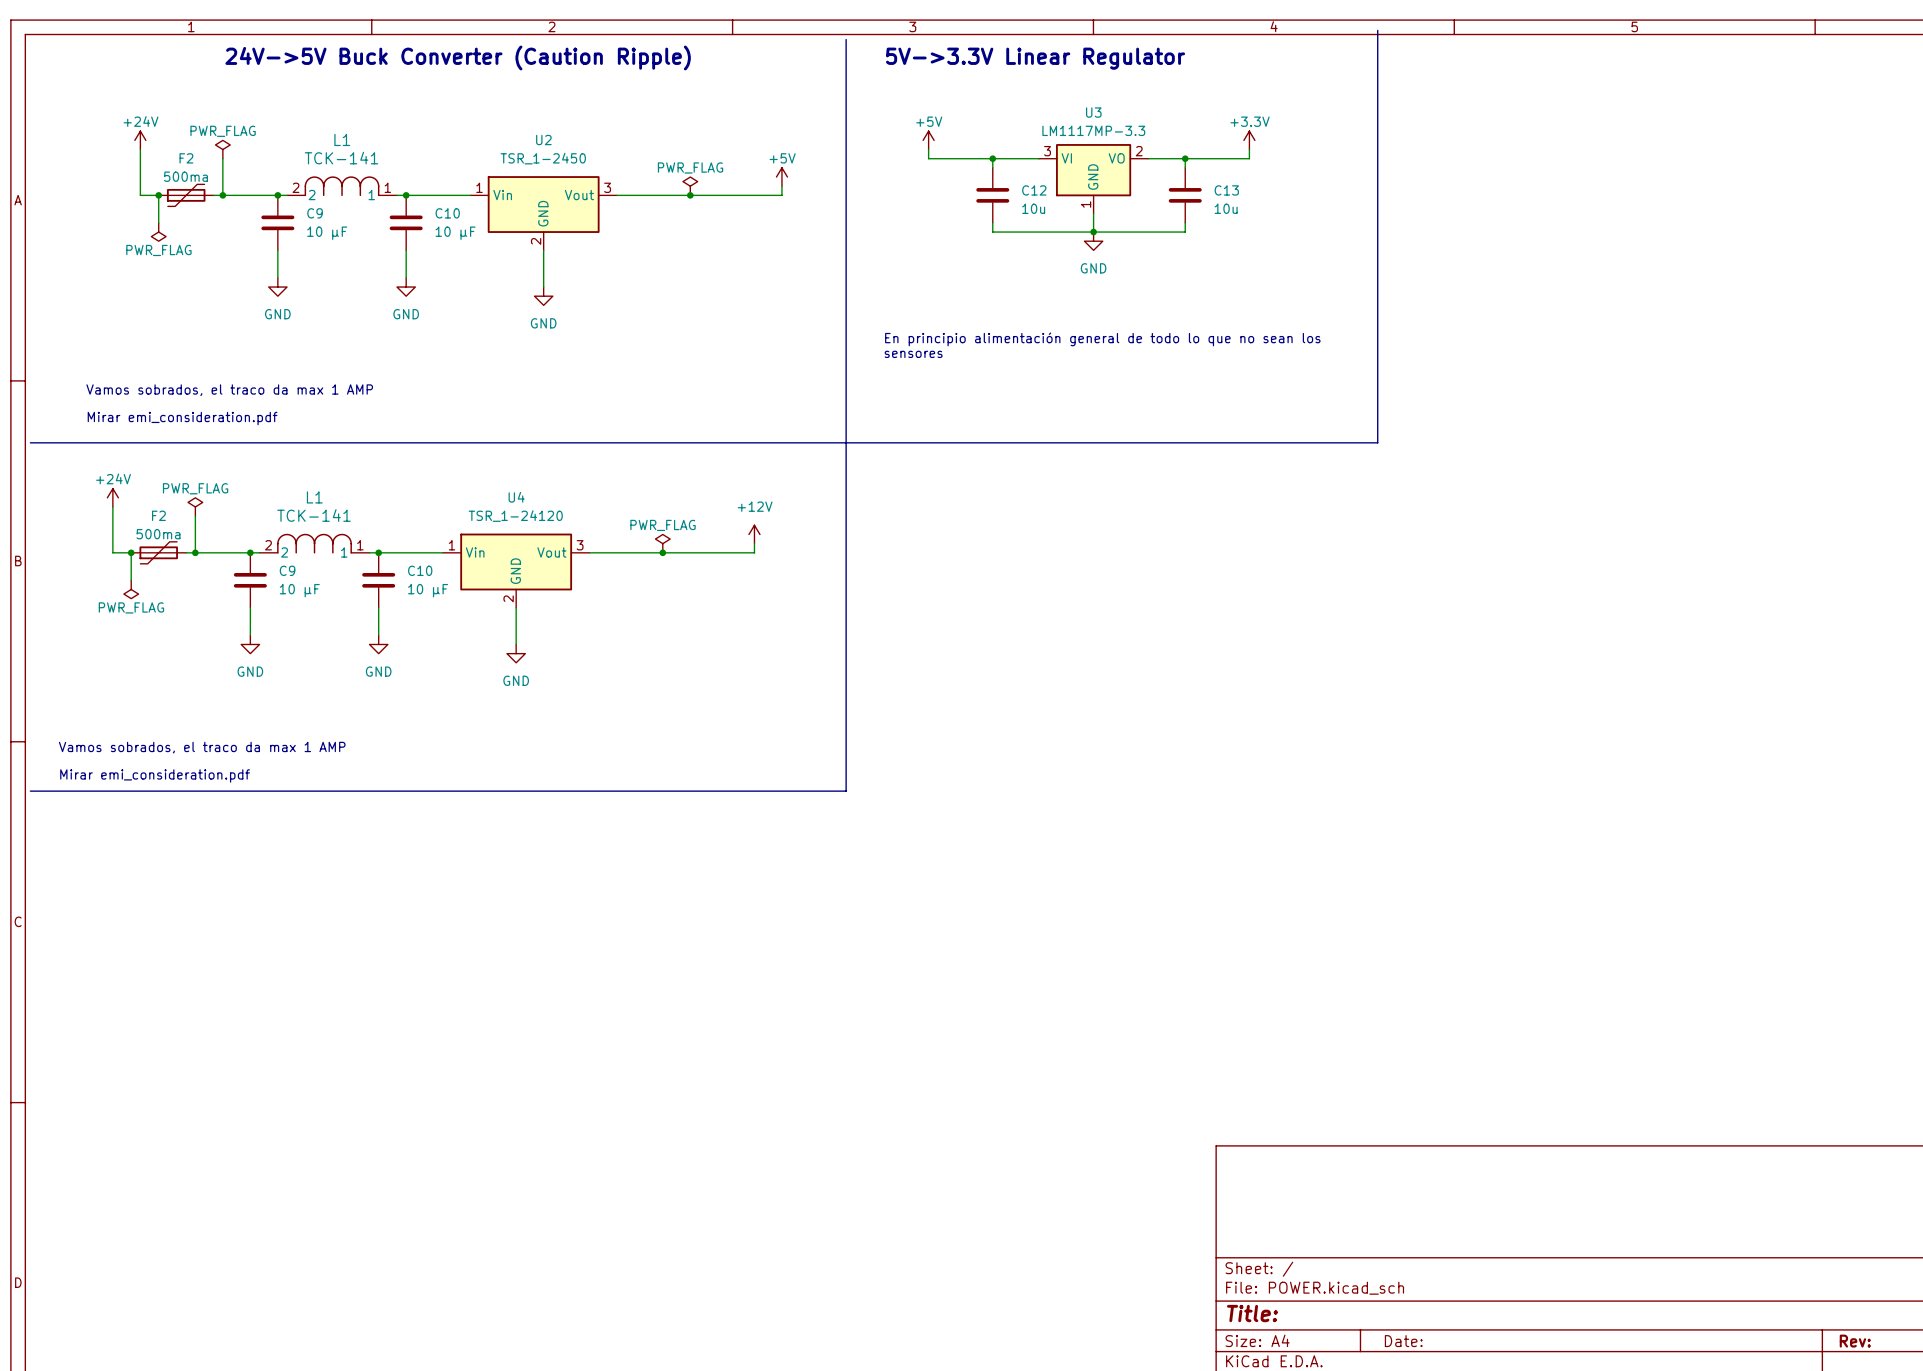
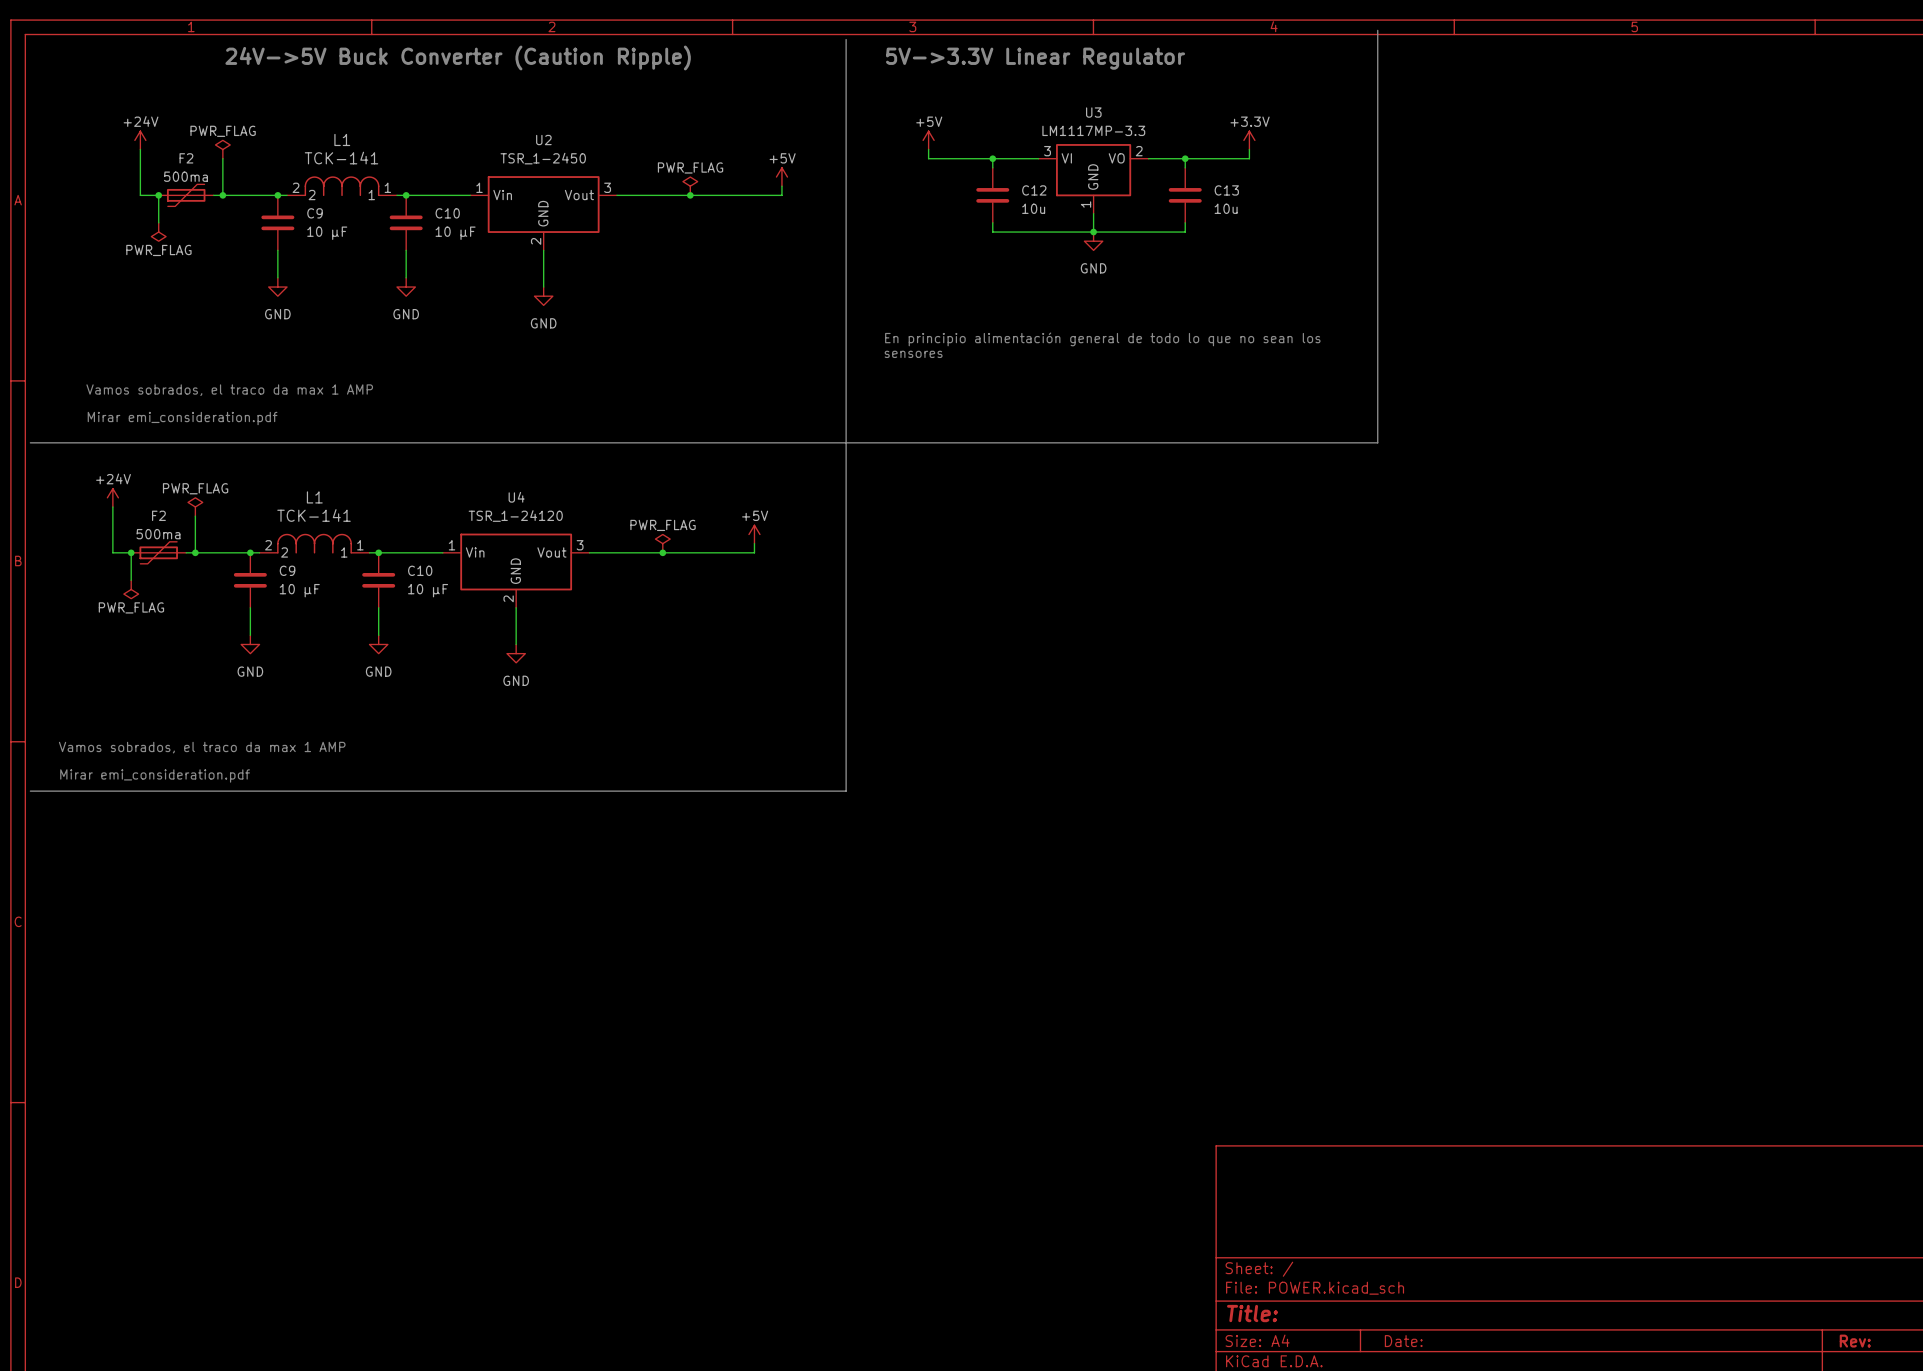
power symbol: +12V (754, 534) -> +5V (754, 534)

